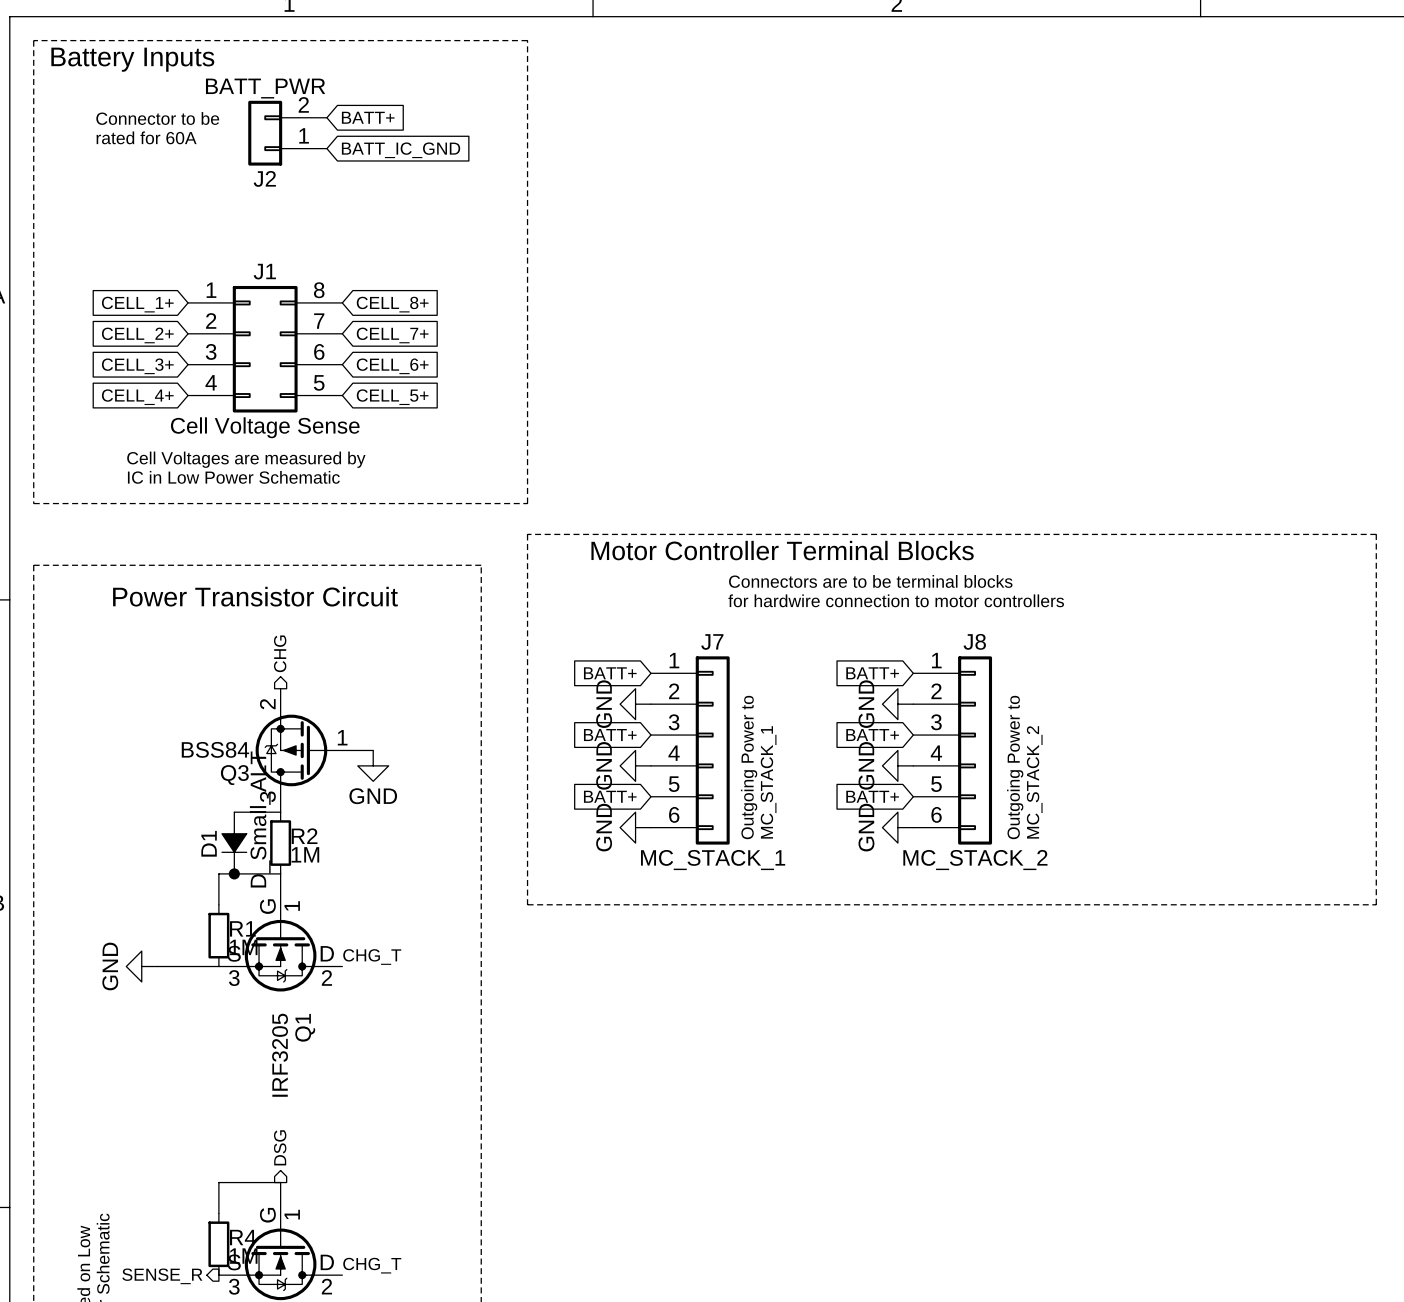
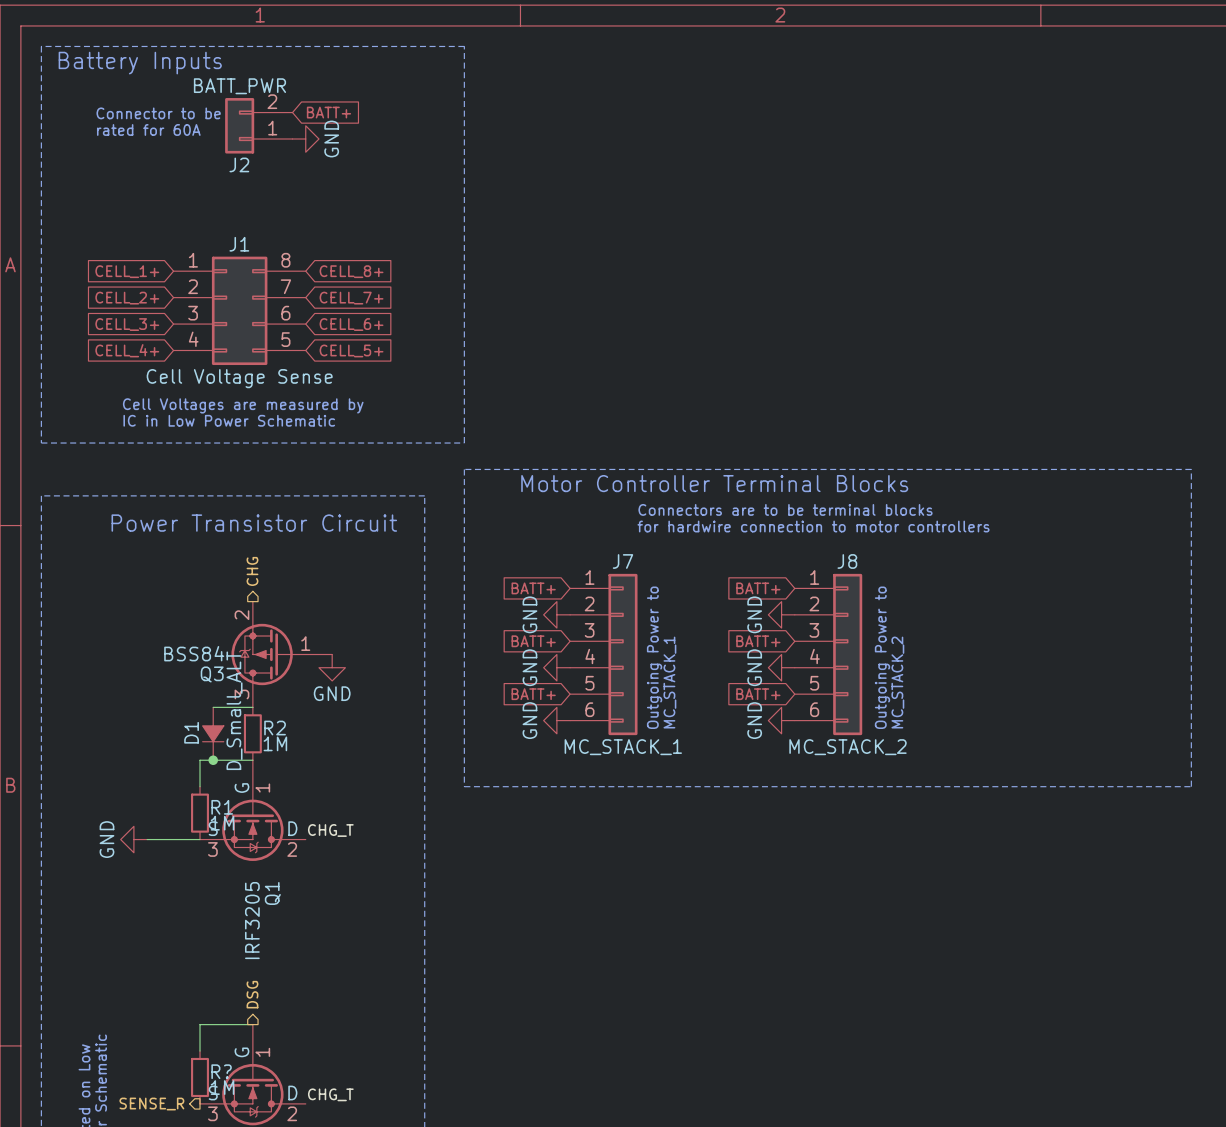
power symbol: none -> GND (305, 139)
global label: BATT_IC_GND (401, 150) -> none
R4 name: R4 (243, 1237) -> R? (221, 1071)

